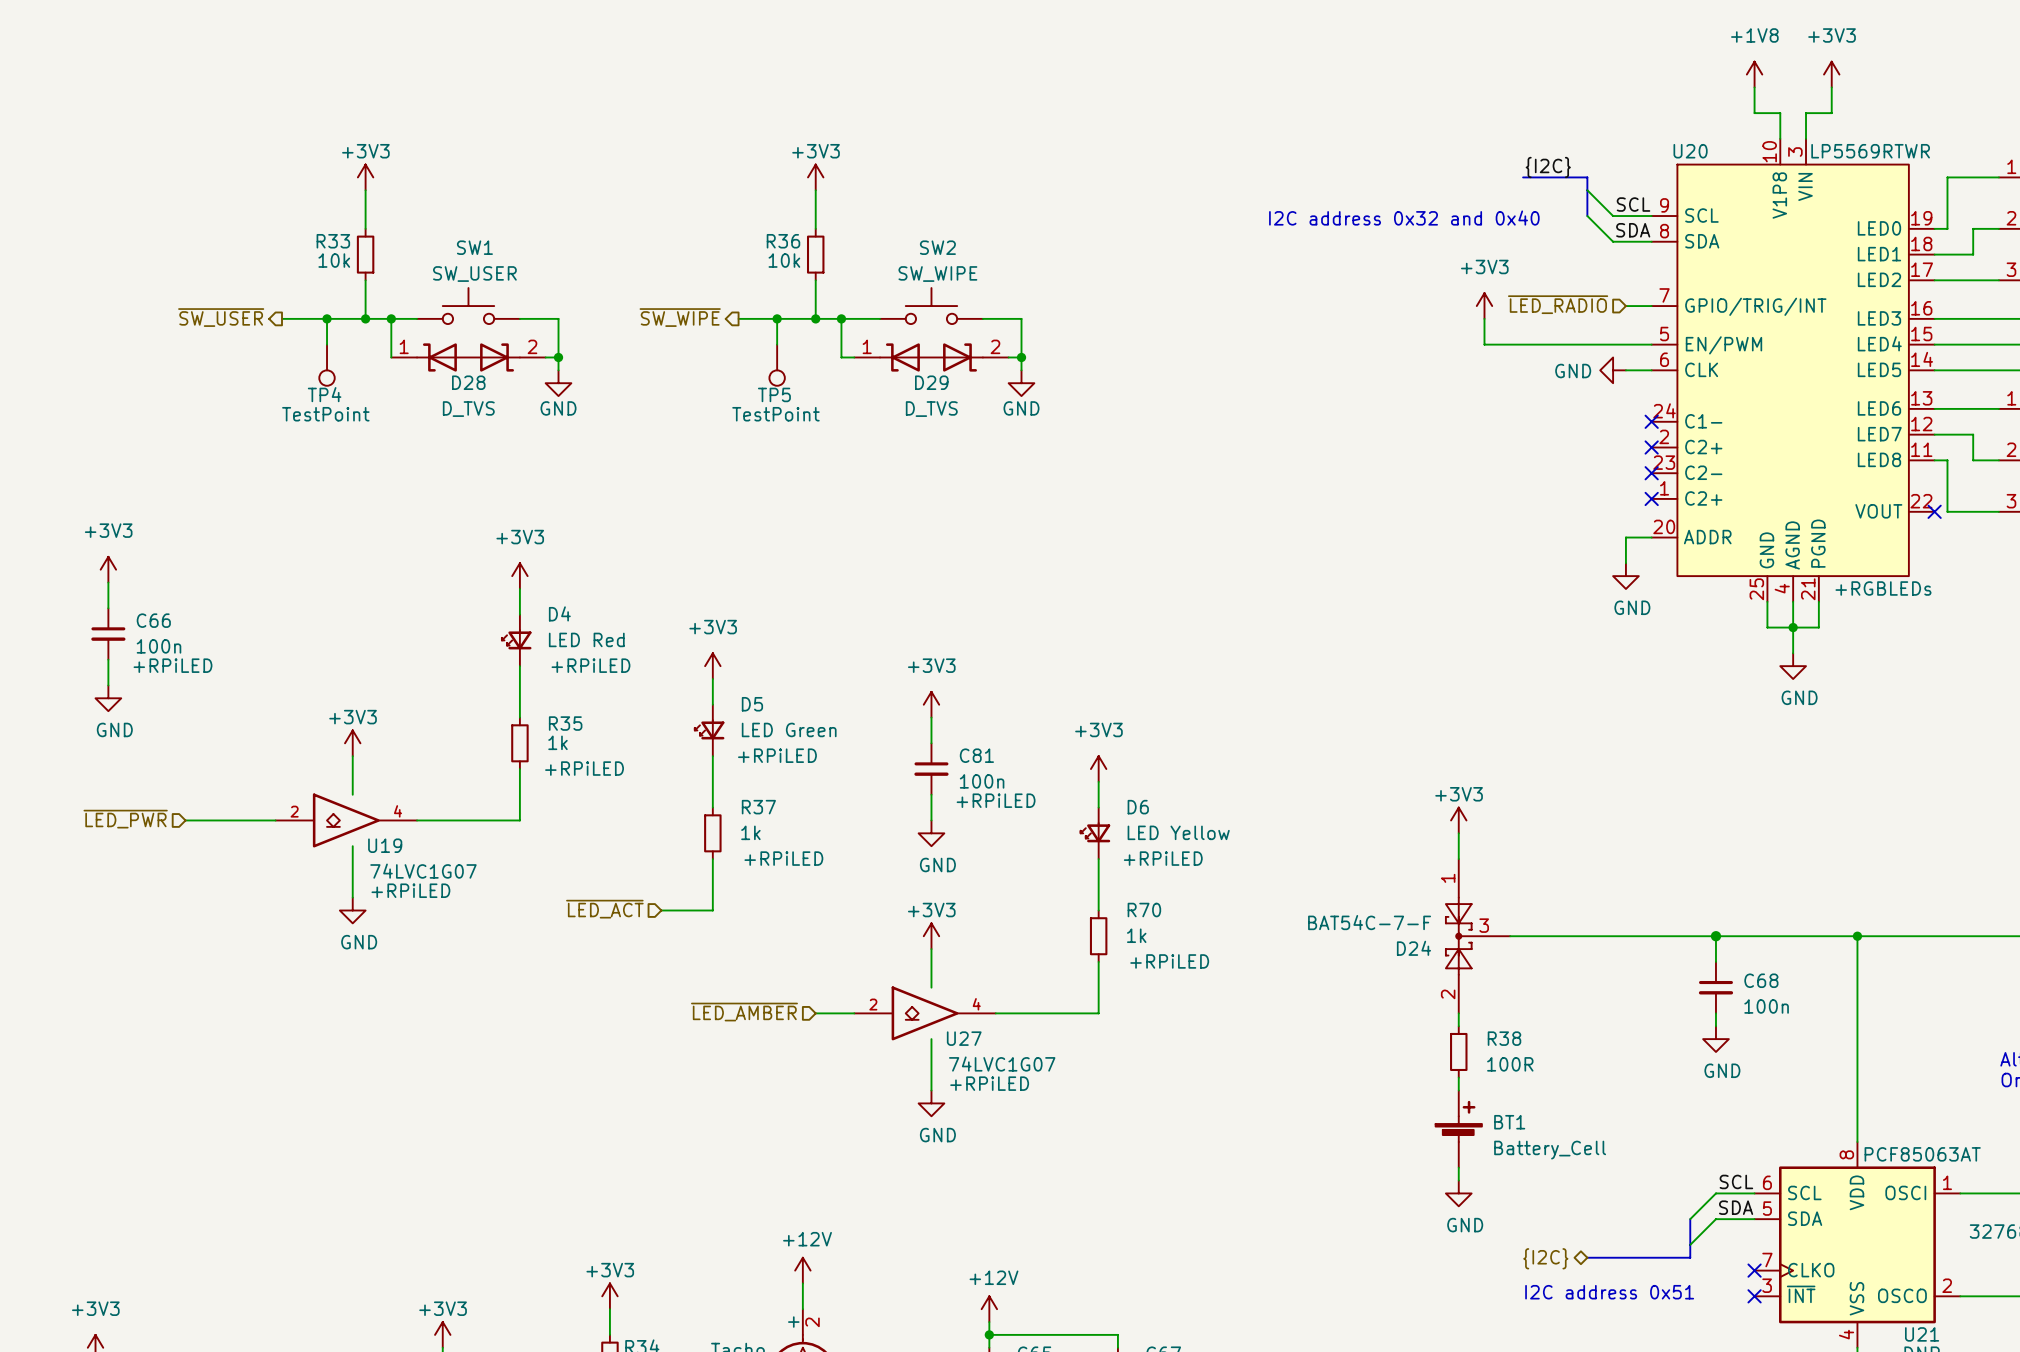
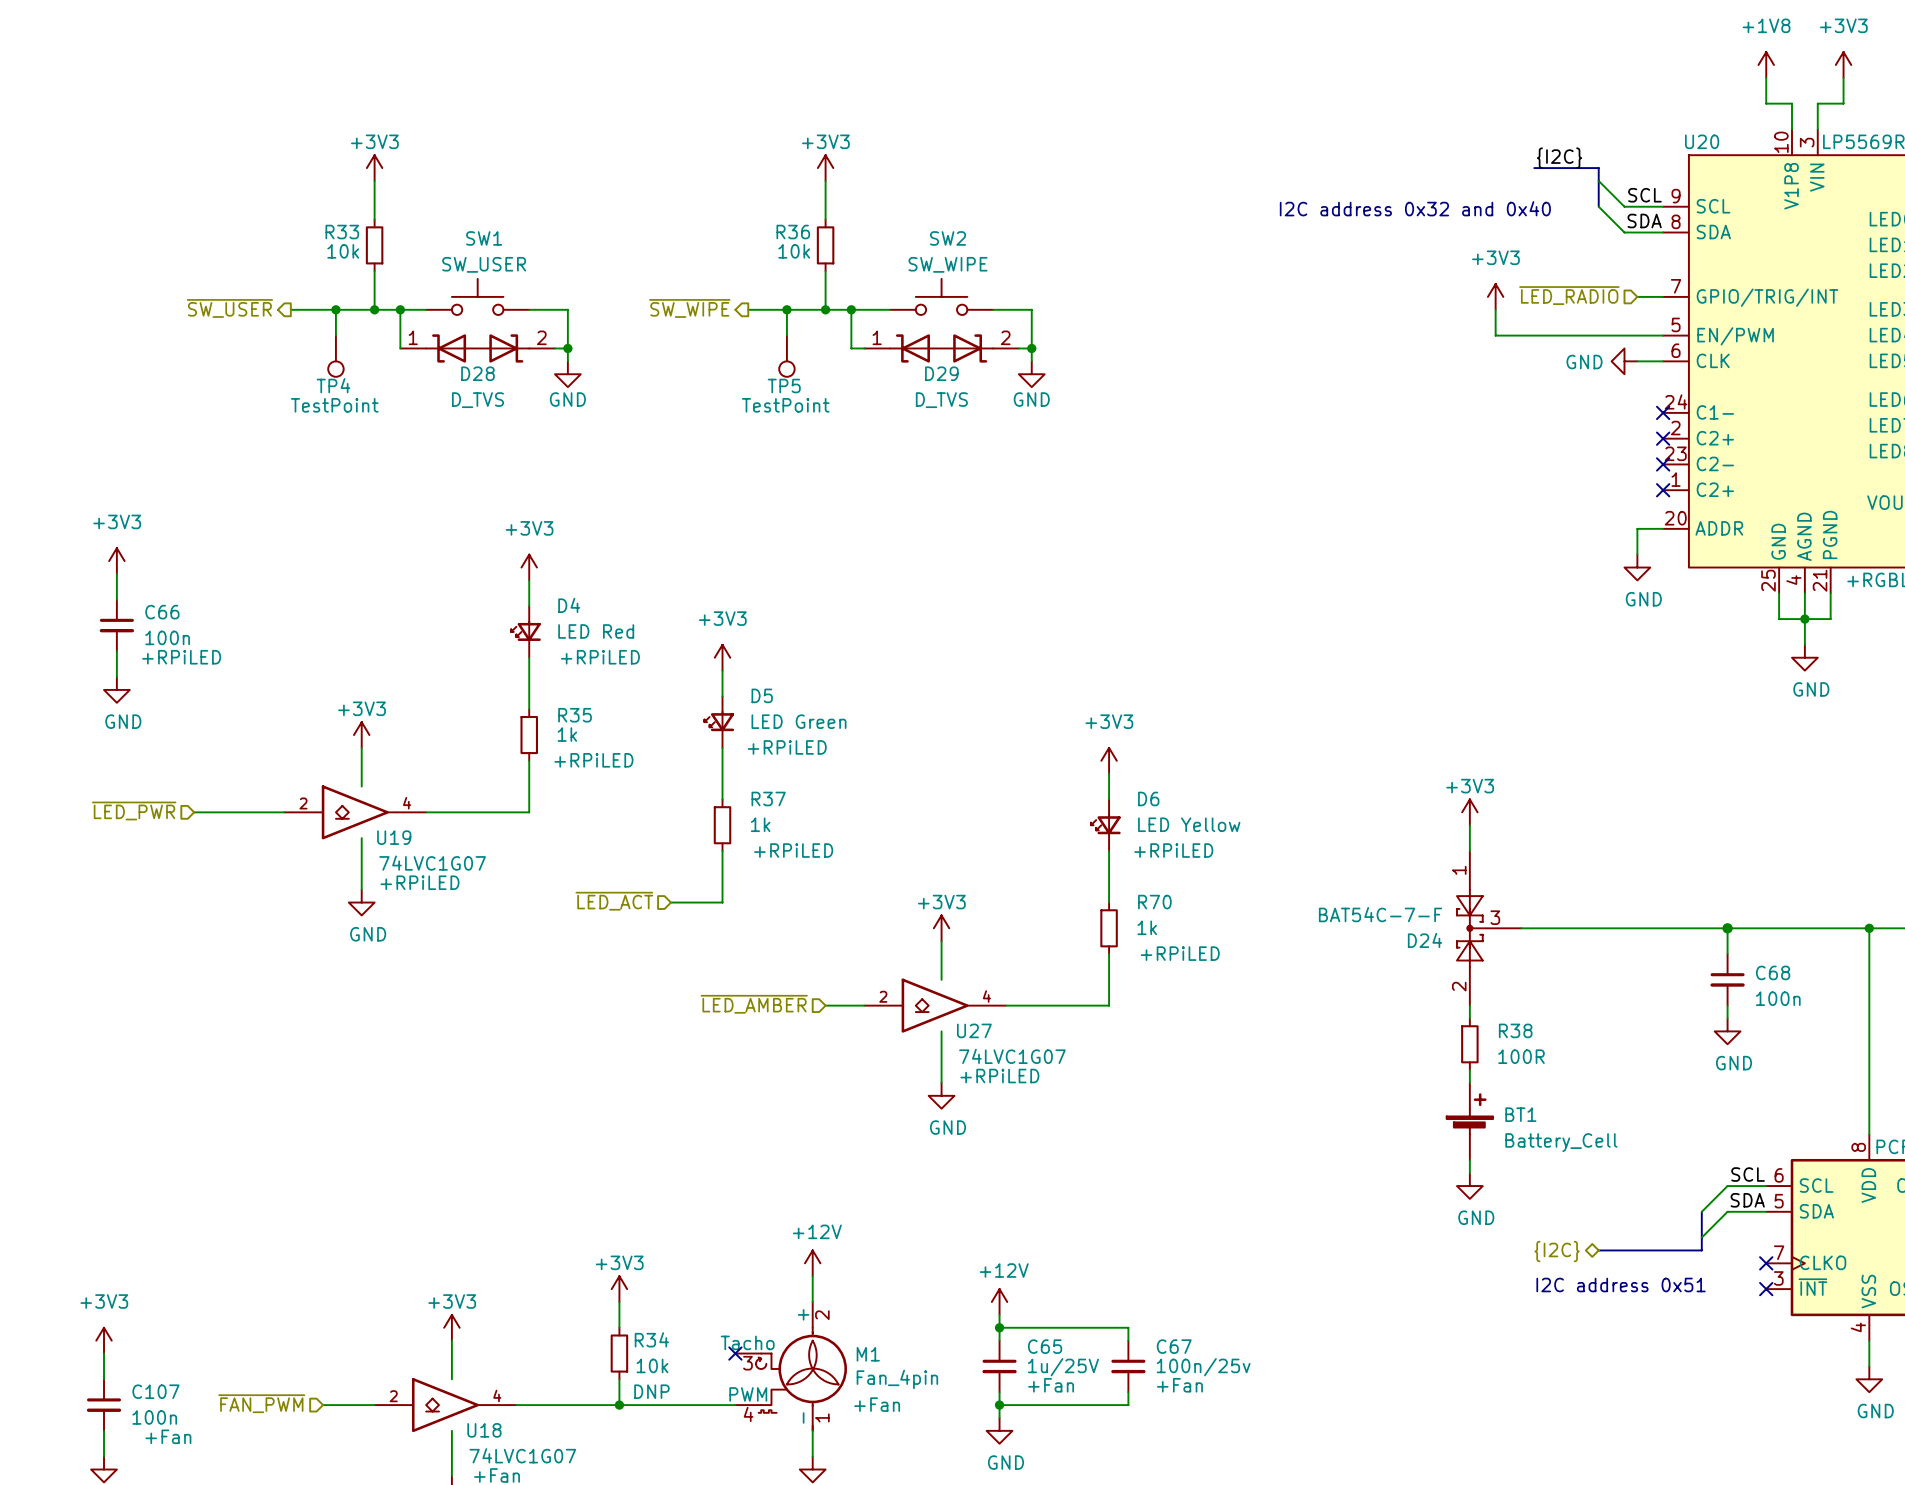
power symbol: +3V3 (931, 704) -> none
wire: (931, 717) (931, 743) -> none
C81: 100n (931, 769) -> none
wire: (931, 794) (931, 820) -> none
power symbol: GND (931, 833) -> none

